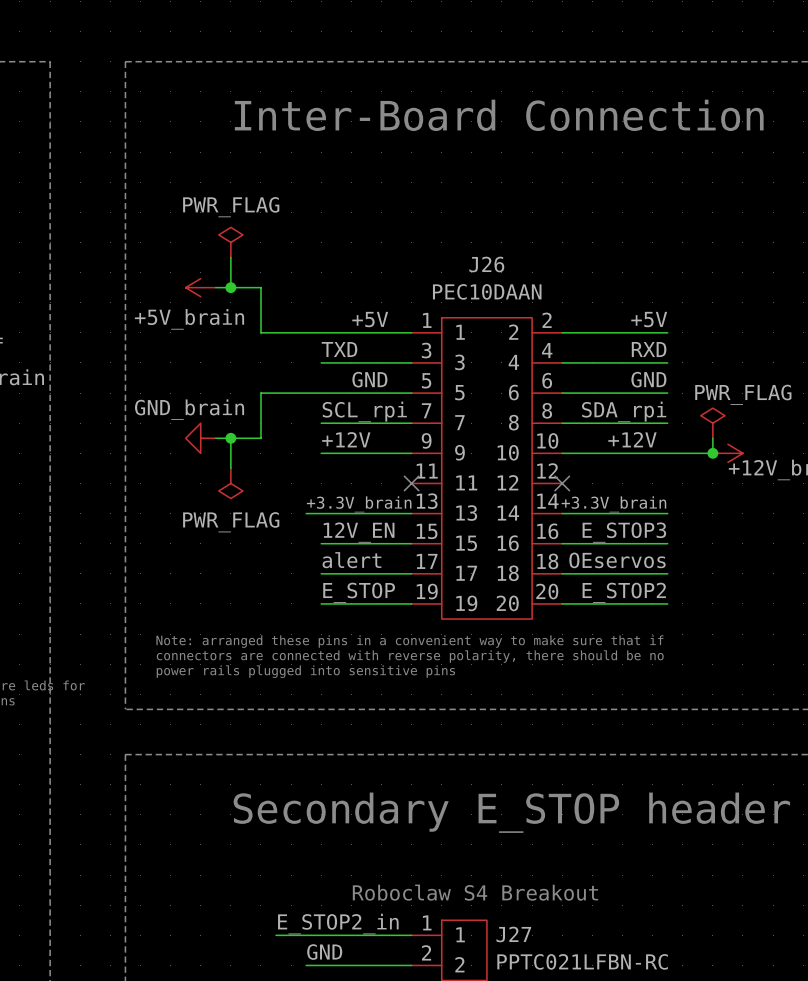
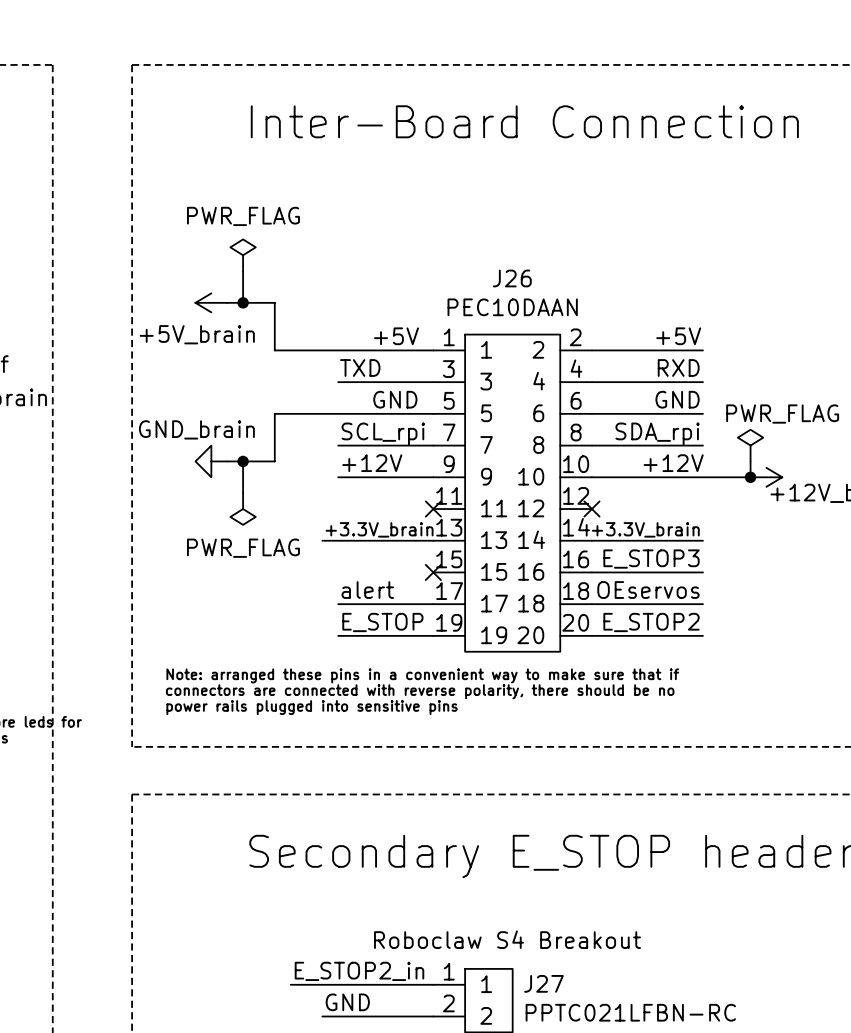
label: 12V_EN (359, 532) -> none
wire: (321, 543) (411, 543) -> none
no-connect mark: none -> (433, 572)

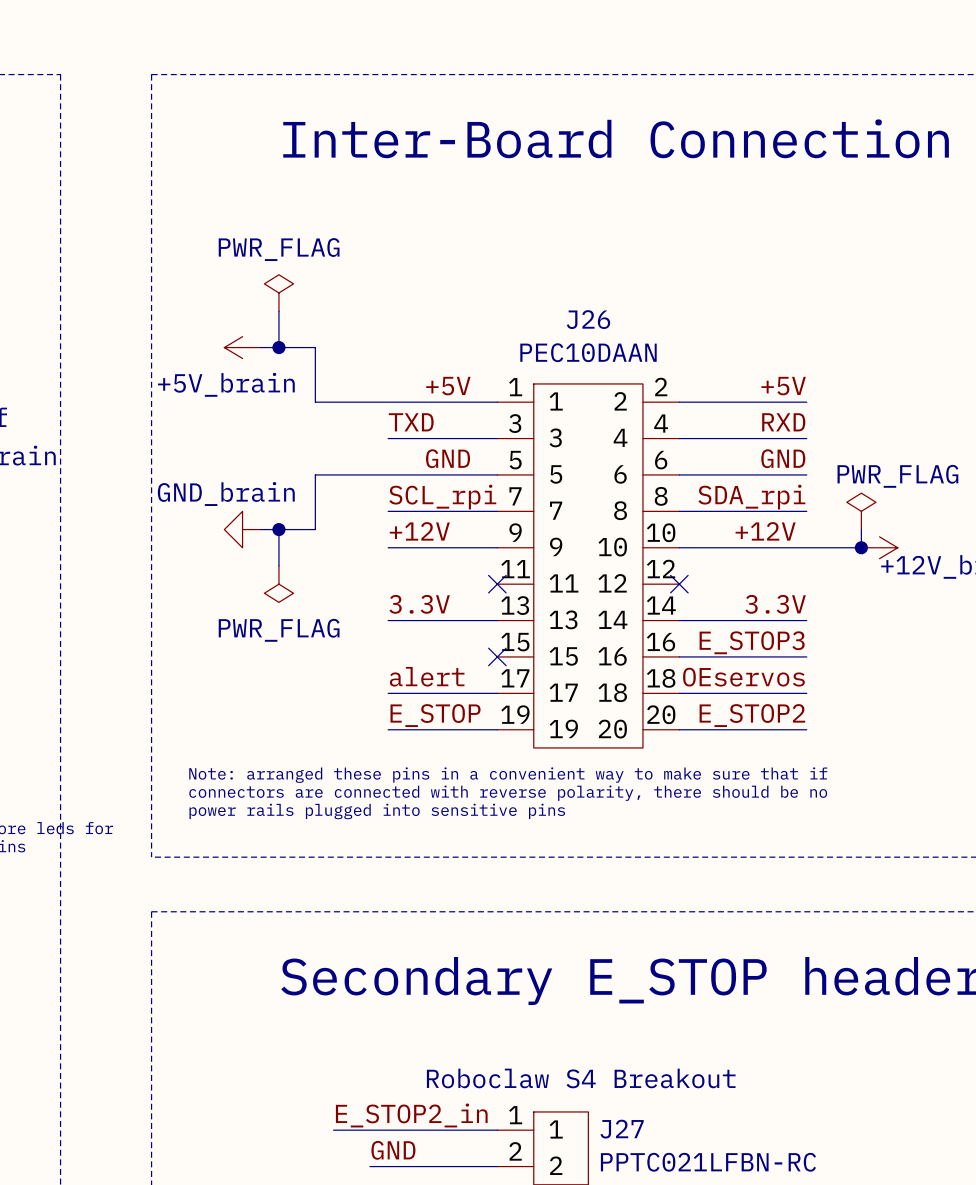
label: none -> 3.3V (419, 604)
label: +3.3V_brain (379, 529) -> none
label: +3.3V_brain (645, 529) -> 3.3V (775, 604)
wire: (322, 540) (338, 540) -> none

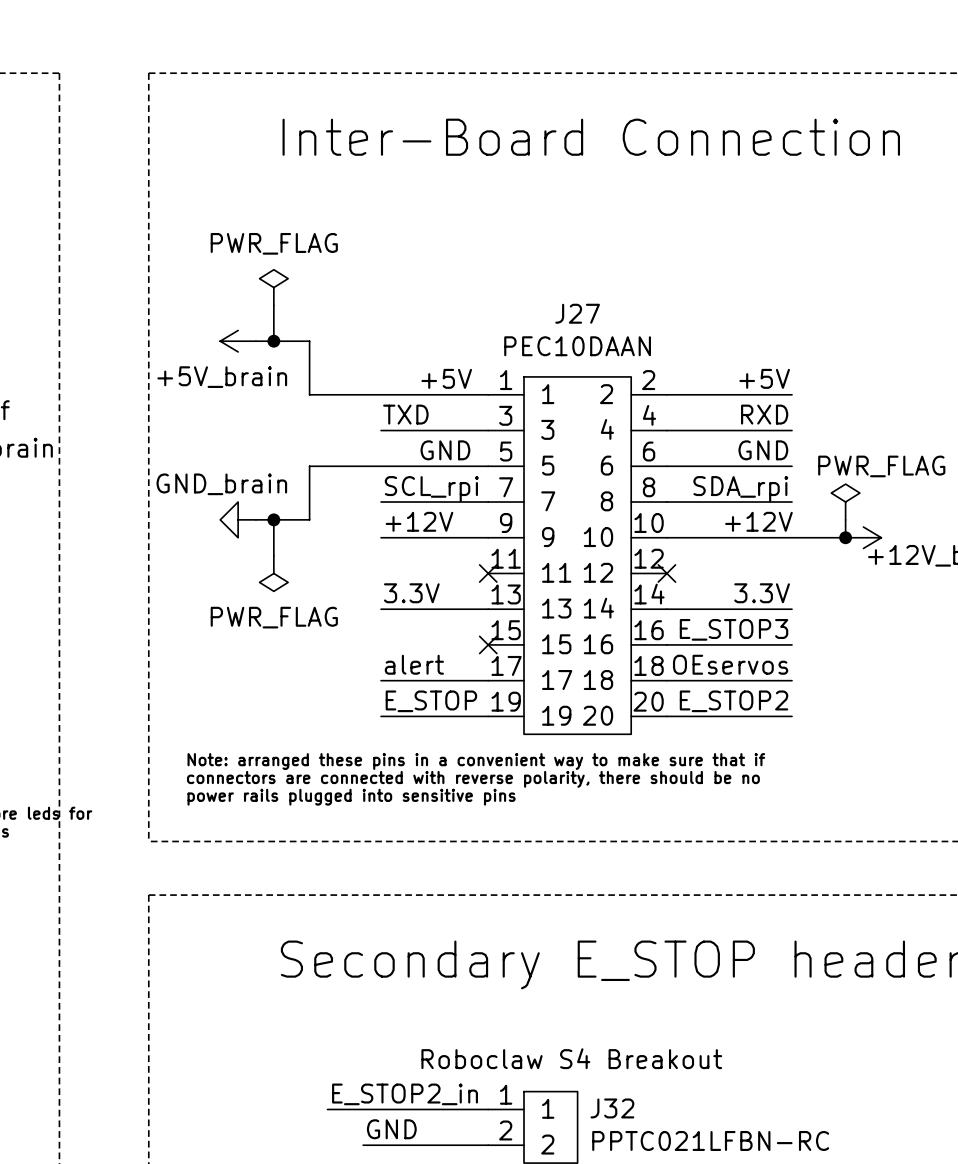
J26 name: J26 (588, 319) -> J27 (577, 313)
J27 name: J27 (622, 1129) -> J32 (612, 1108)

